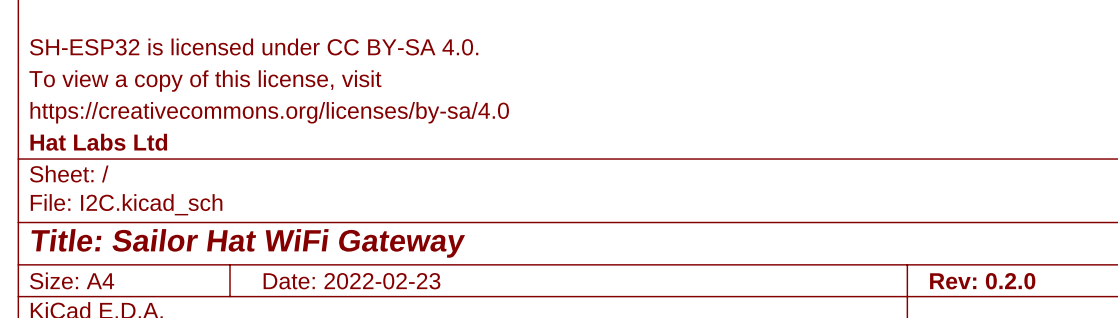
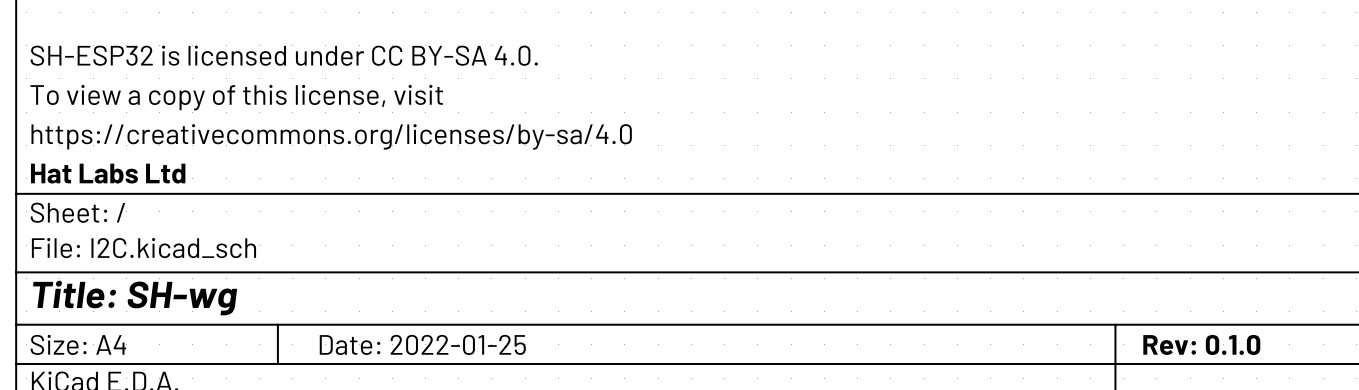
title block: Title: Sailor Hat WiFi Gateway (248, 243) -> Title: SH-wg (135, 298)
title block: Date: 2022-02-23 (352, 281) -> Date: 2022-01-25 (422, 344)
title block: Rev: 0.2.0 (982, 281) -> Rev: 0.1.0 (1201, 344)

